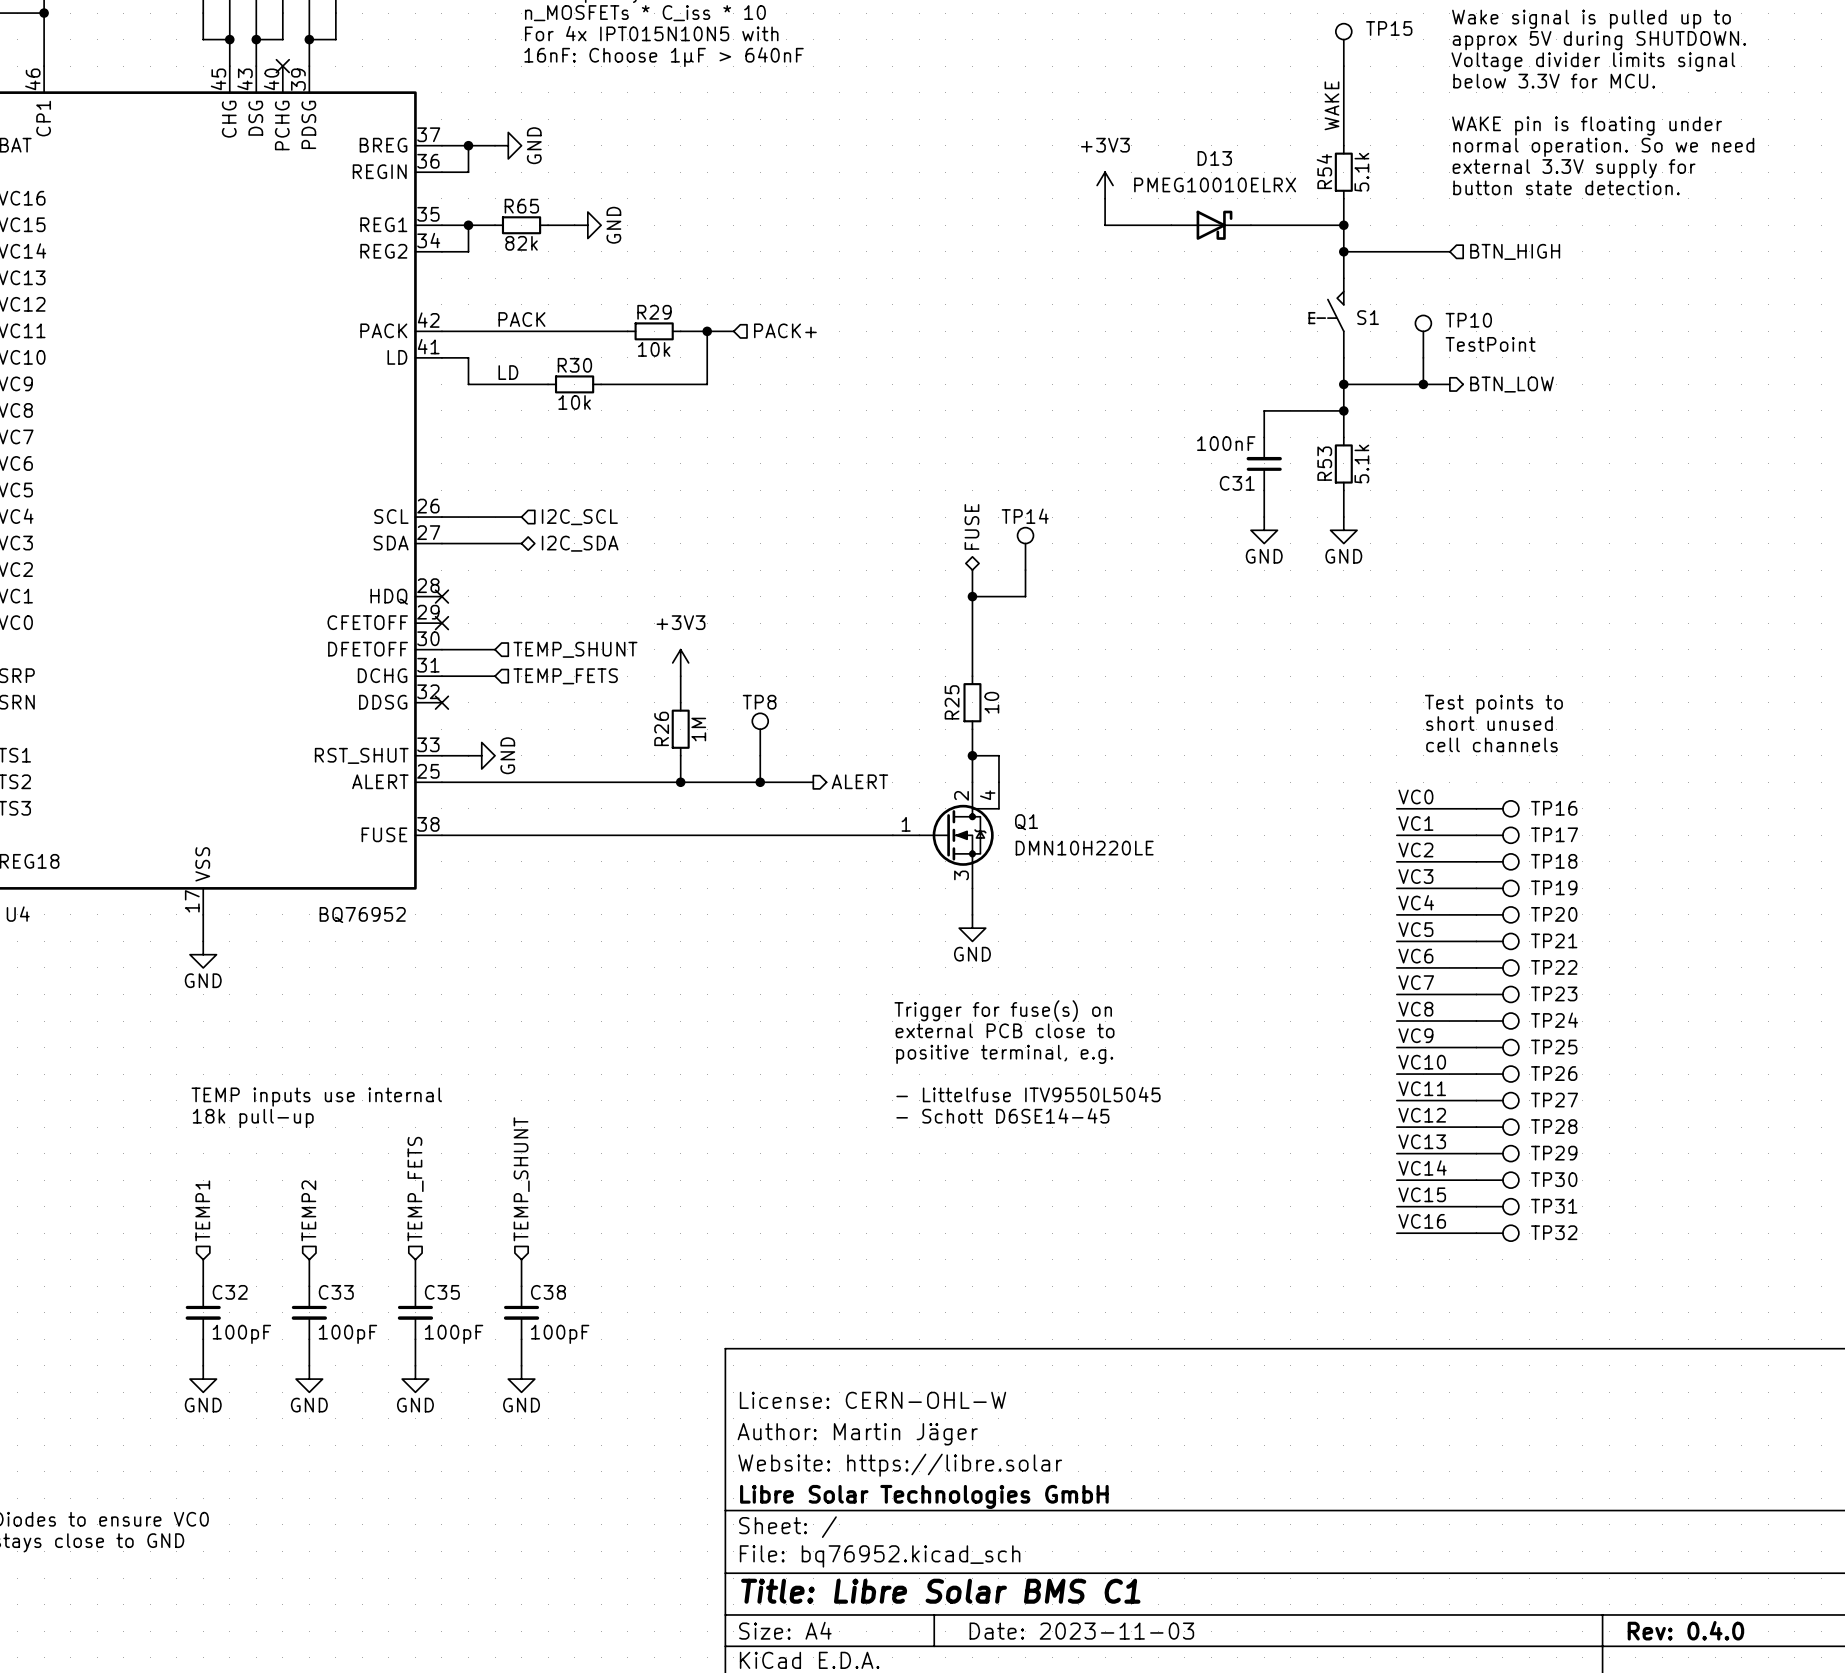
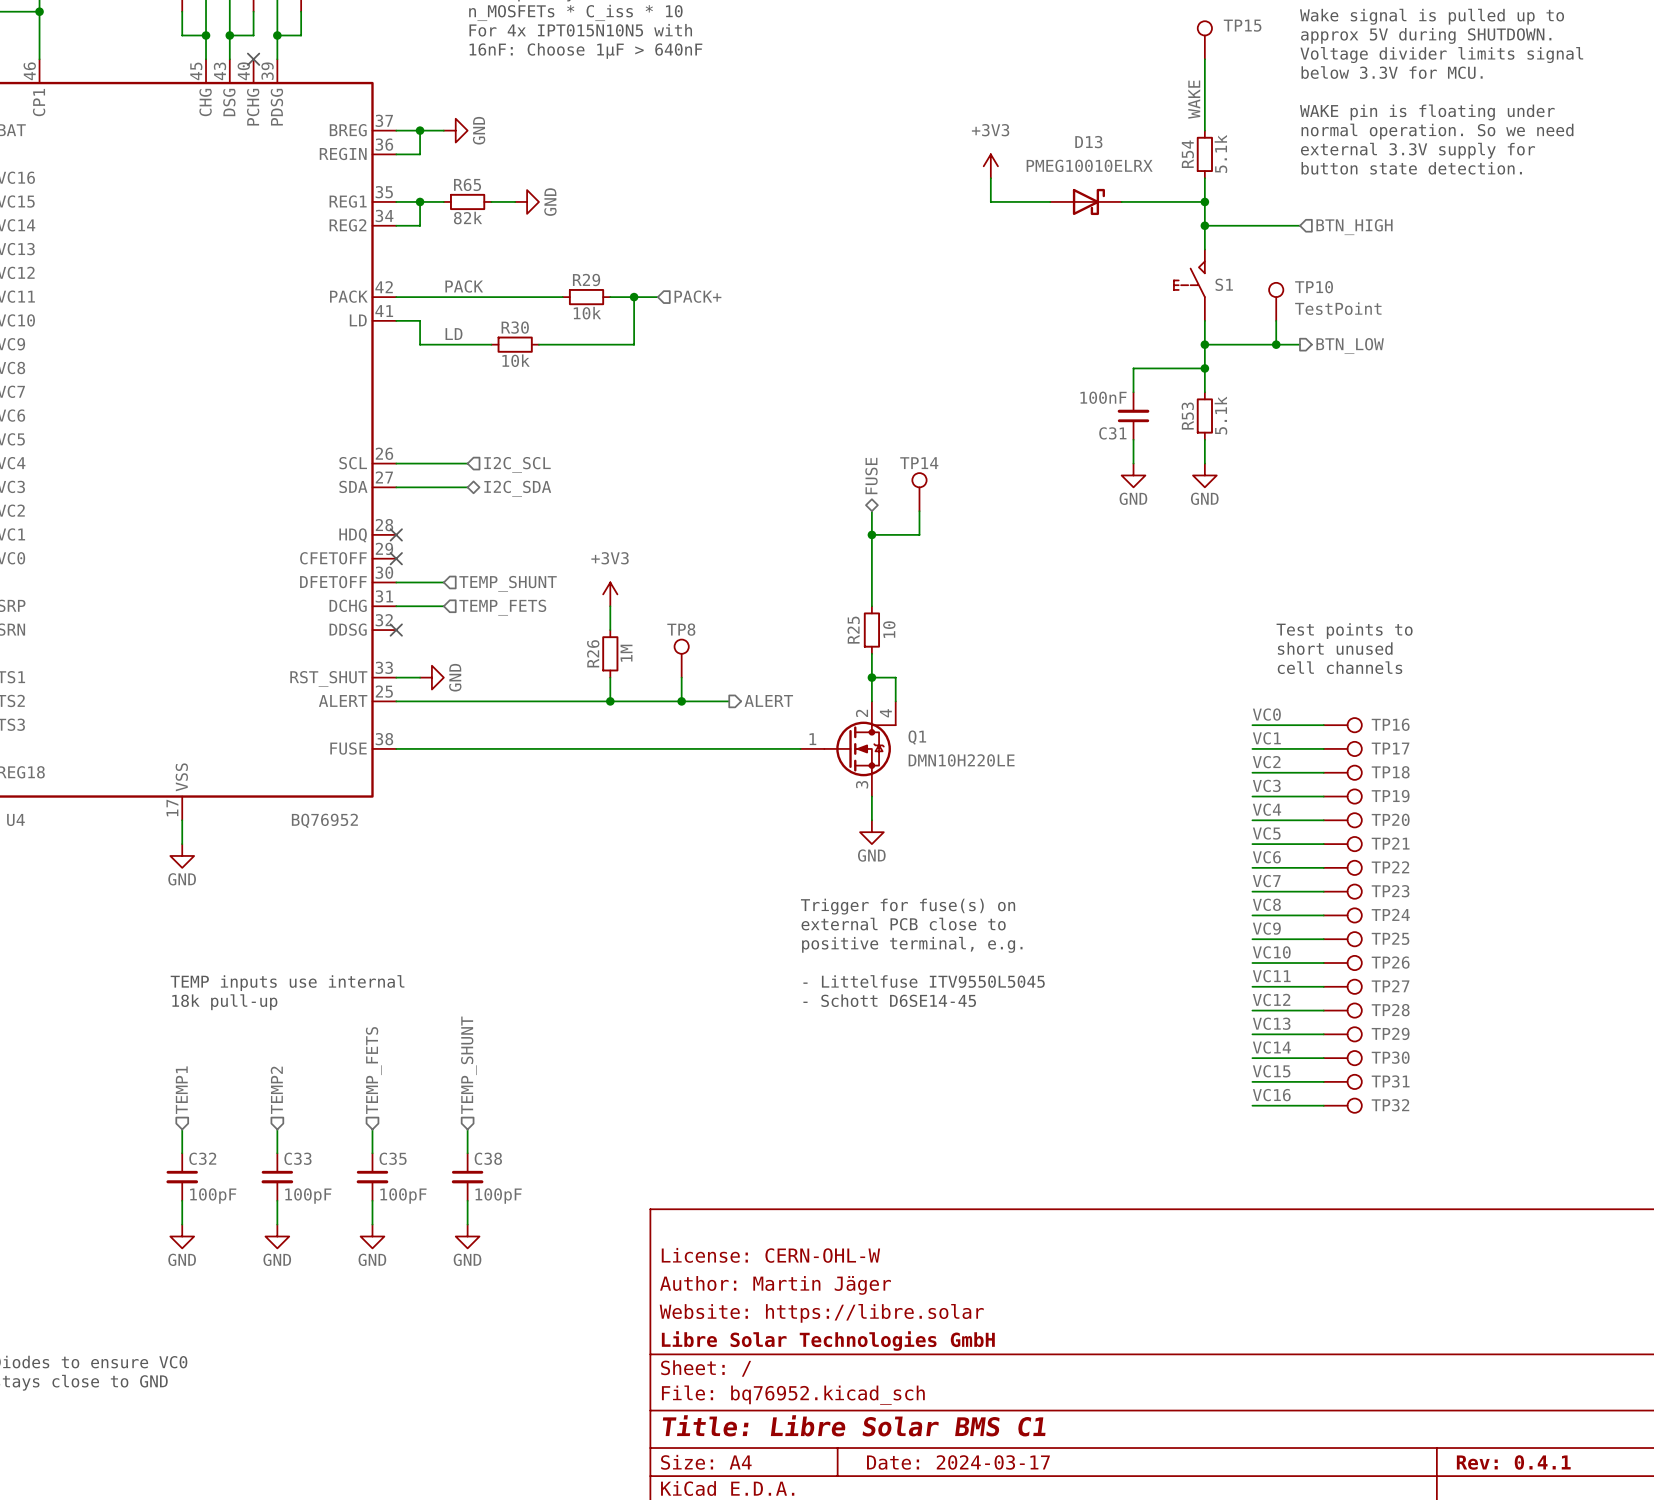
title block: Rev: 0.4.0 (1685, 1630) -> Rev: 0.4.1 (1513, 1462)
title block: Date: 2023-11-03 (1081, 1631) -> Date: 2024-03-17 (958, 1462)

